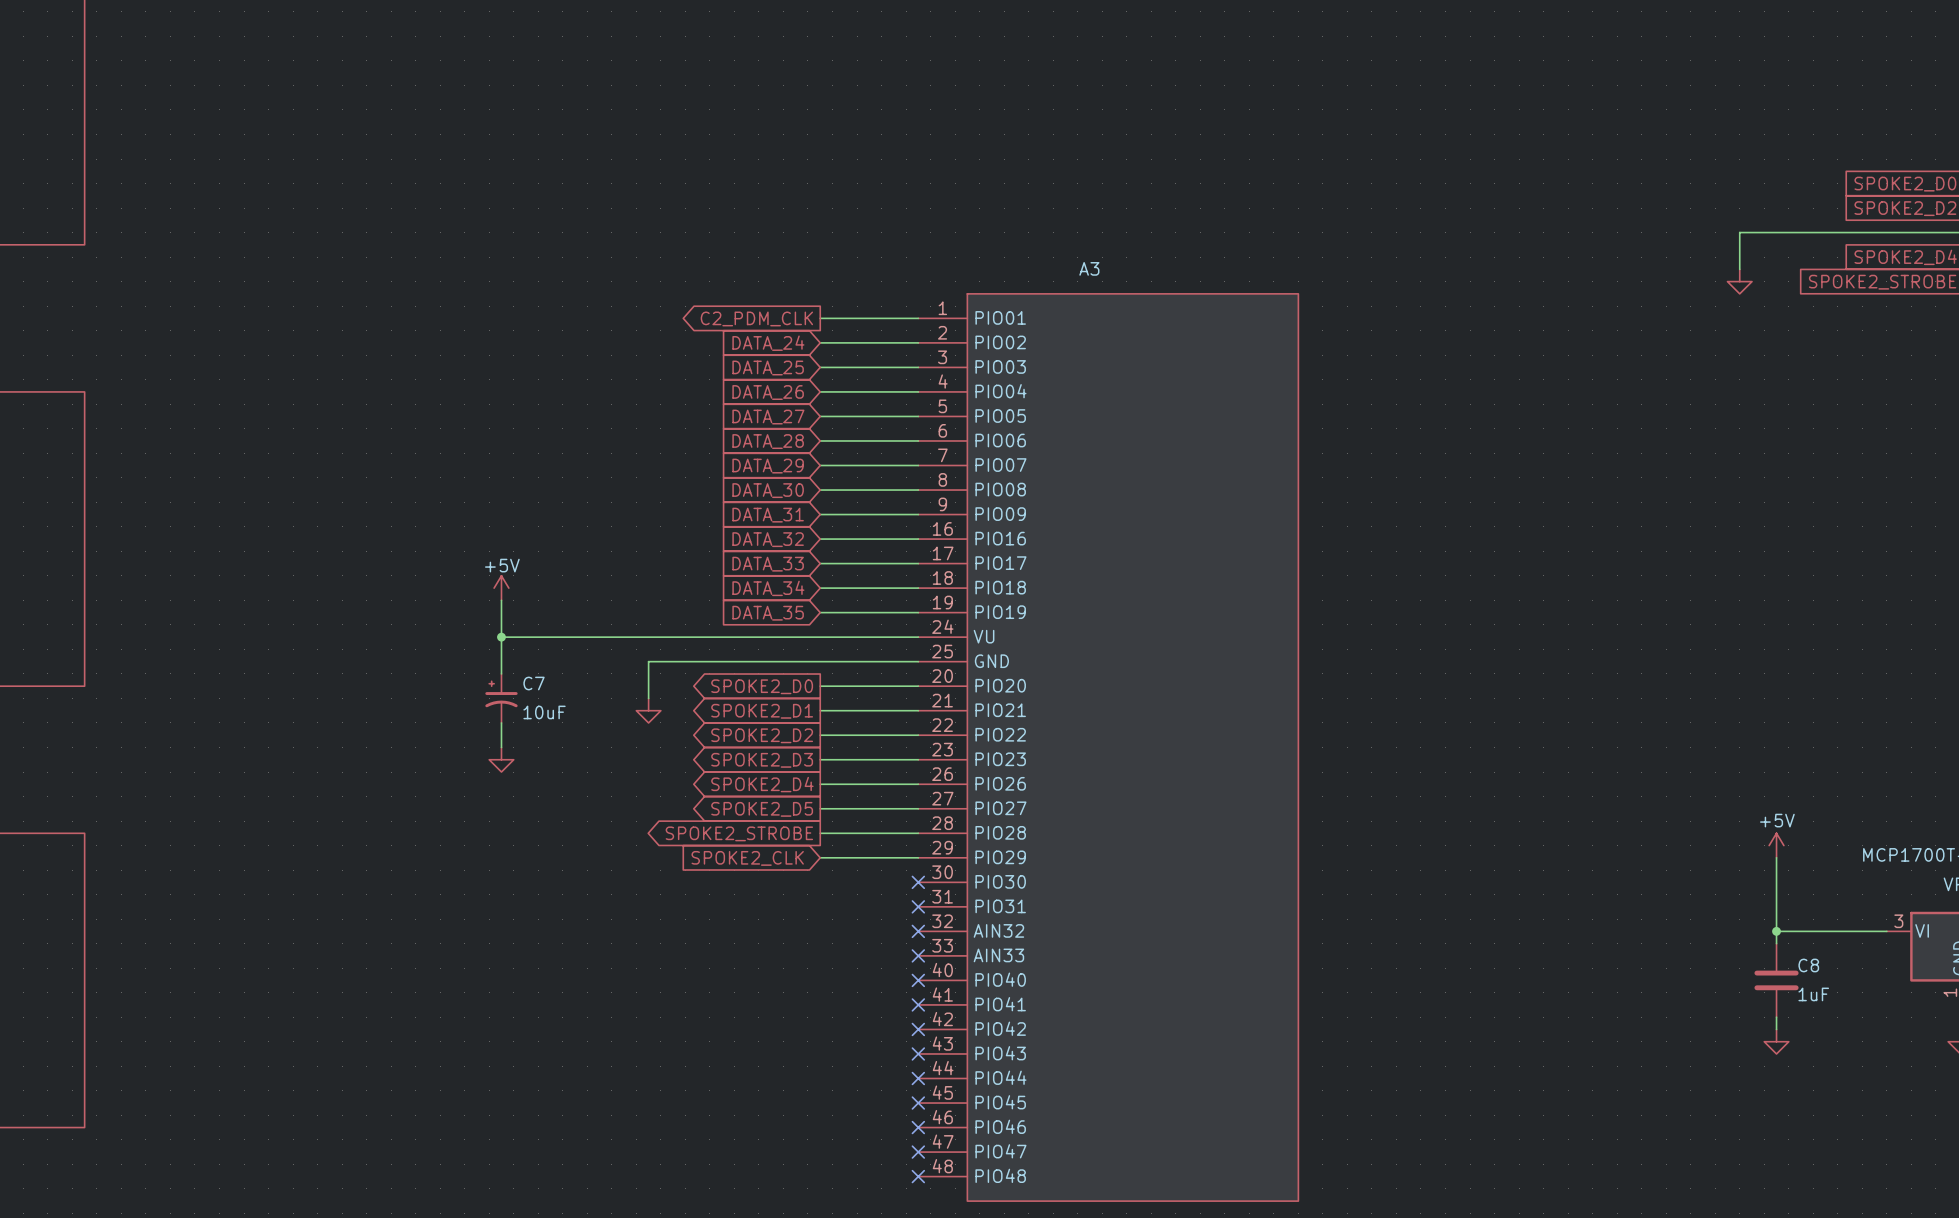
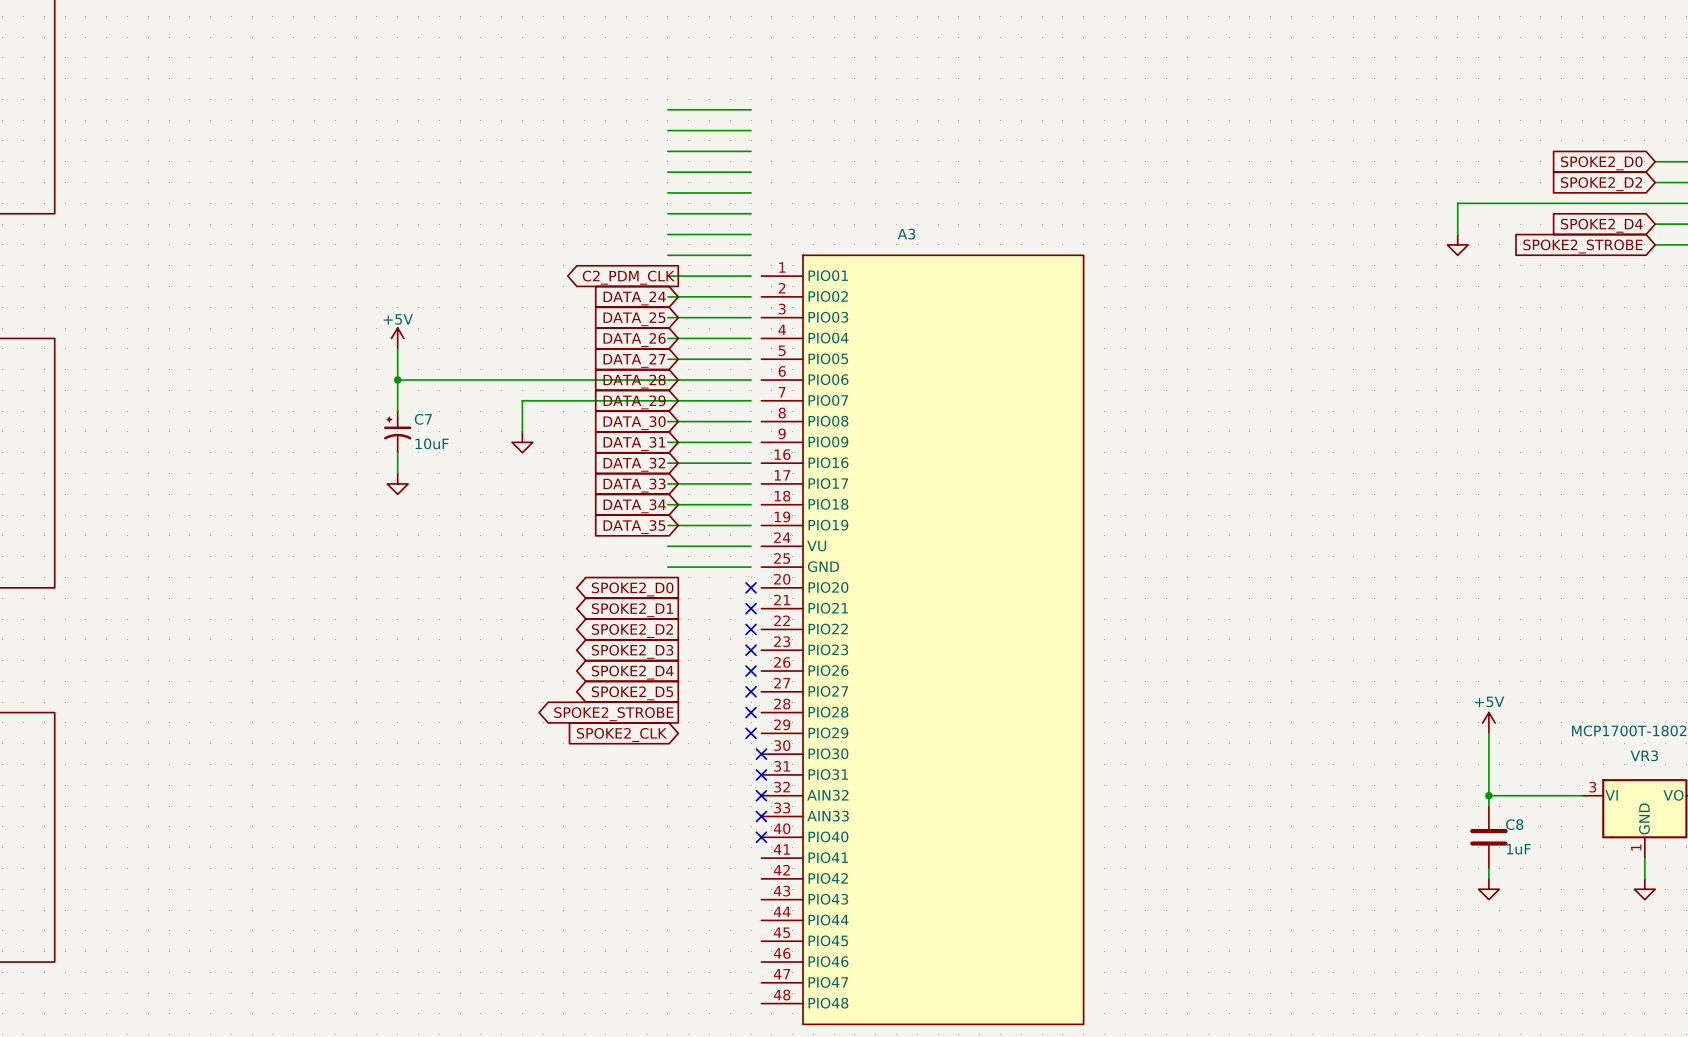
wire: none -> (667, 109) (751, 109)
wire: none -> (667, 130) (751, 130)
wire: none -> (667, 151) (751, 151)
wire: none -> (667, 172) (751, 172)
wire: none -> (667, 192) (751, 192)
wire: none -> (667, 213) (751, 213)
wire: none -> (667, 234) (751, 234)
wire: none -> (667, 255) (751, 255)
wire: (906, 318) (918, 318) -> (667, 276) (678, 276)
wire: (906, 342) (918, 342) -> (667, 296) (678, 296)
wire: (906, 367) (918, 367) -> (667, 317) (678, 317)
wire: (906, 391) (918, 391) -> (667, 338) (678, 338)
wire: (906, 416) (918, 416) -> (667, 359) (678, 359)
wire: none -> (397, 380) (678, 380)
junction: none -> (397, 380)
wire: (906, 440) (918, 440) -> none
wire: none -> (678, 400) (522, 400) (522, 431)
wire: (906, 465) (918, 465) -> none
wire: (906, 490) (918, 490) -> (667, 421) (678, 421)
power symbol: none -> (522, 442)
wire: (906, 514) (918, 514) -> (667, 442) (678, 442)
wire: (906, 539) (918, 539) -> (667, 463) (678, 463)
power symbol: none -> (397, 483)
wire: (906, 563) (918, 563) -> (667, 483) (678, 483)
power symbol position: +5V (501, 588) -> +5V (397, 338)
wire: (906, 588) (918, 588) -> (667, 504) (678, 504)
wire: (501, 600) (501, 673) -> (397, 348) (397, 411)
wire: (906, 612) (918, 612) -> (667, 525) (678, 525)
wire: (501, 637) (807, 637) -> none
junction: (501, 637) -> none
wire: (906, 637) (918, 637) -> none
wire: (807, 661) (648, 661) (648, 698) -> none
wire: (906, 661) (918, 661) -> none
wire: (820, 686) (918, 686) -> none
no-connect mark: none -> (751, 587)
C7 position: (501, 698) -> (397, 431)
power symbol: (648, 710) -> none
wire: (820, 710) (918, 710) -> none
no-connect mark: none -> (751, 608)
wire: (501, 722) (501, 747) -> (397, 452) (397, 473)
wire: (820, 735) (918, 735) -> none
no-connect mark: none -> (751, 629)
power symbol: (501, 759) -> none
wire: (820, 759) (918, 759) -> none
no-connect mark: none -> (751, 650)
wire: (820, 784) (918, 784) -> none
no-connect mark: none -> (751, 671)
wire: (820, 808) (918, 808) -> none
no-connect mark: none -> (751, 691)
wire: (820, 833) (918, 833) -> none
no-connect mark: none -> (751, 712)
wire: (820, 857) (918, 857) -> none
no-connect mark: none -> (751, 733)
no-connect mark: (918, 1004) -> none
no-connect mark: (918, 1029) -> none
no-connect mark: (918, 1053) -> none
no-connect mark: (918, 1078) -> none
no-connect mark: (918, 1103) -> none
no-connect mark: (918, 1127) -> none
no-connect mark: (918, 1152) -> none
no-connect mark: (918, 1176) -> none

